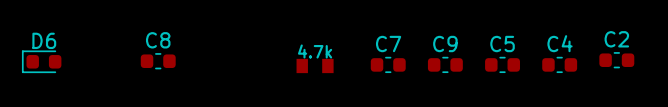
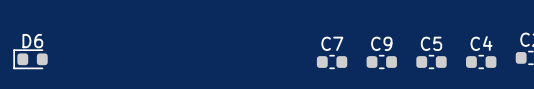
C8: (158, 61) -> none
part: 4.7k (315, 65) -> none

